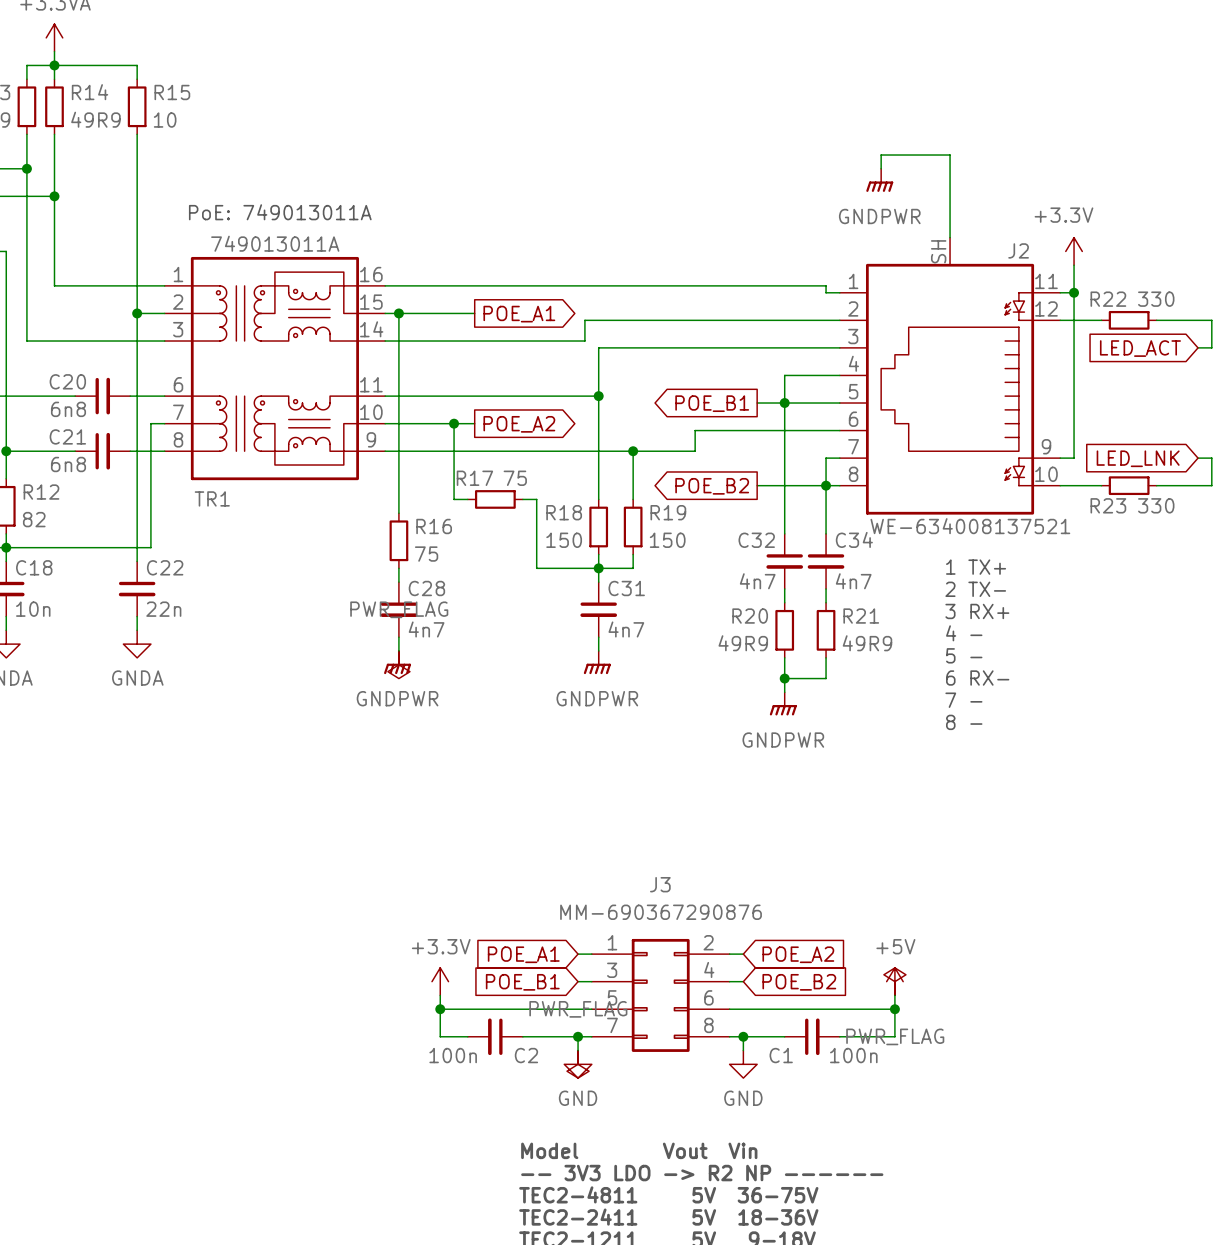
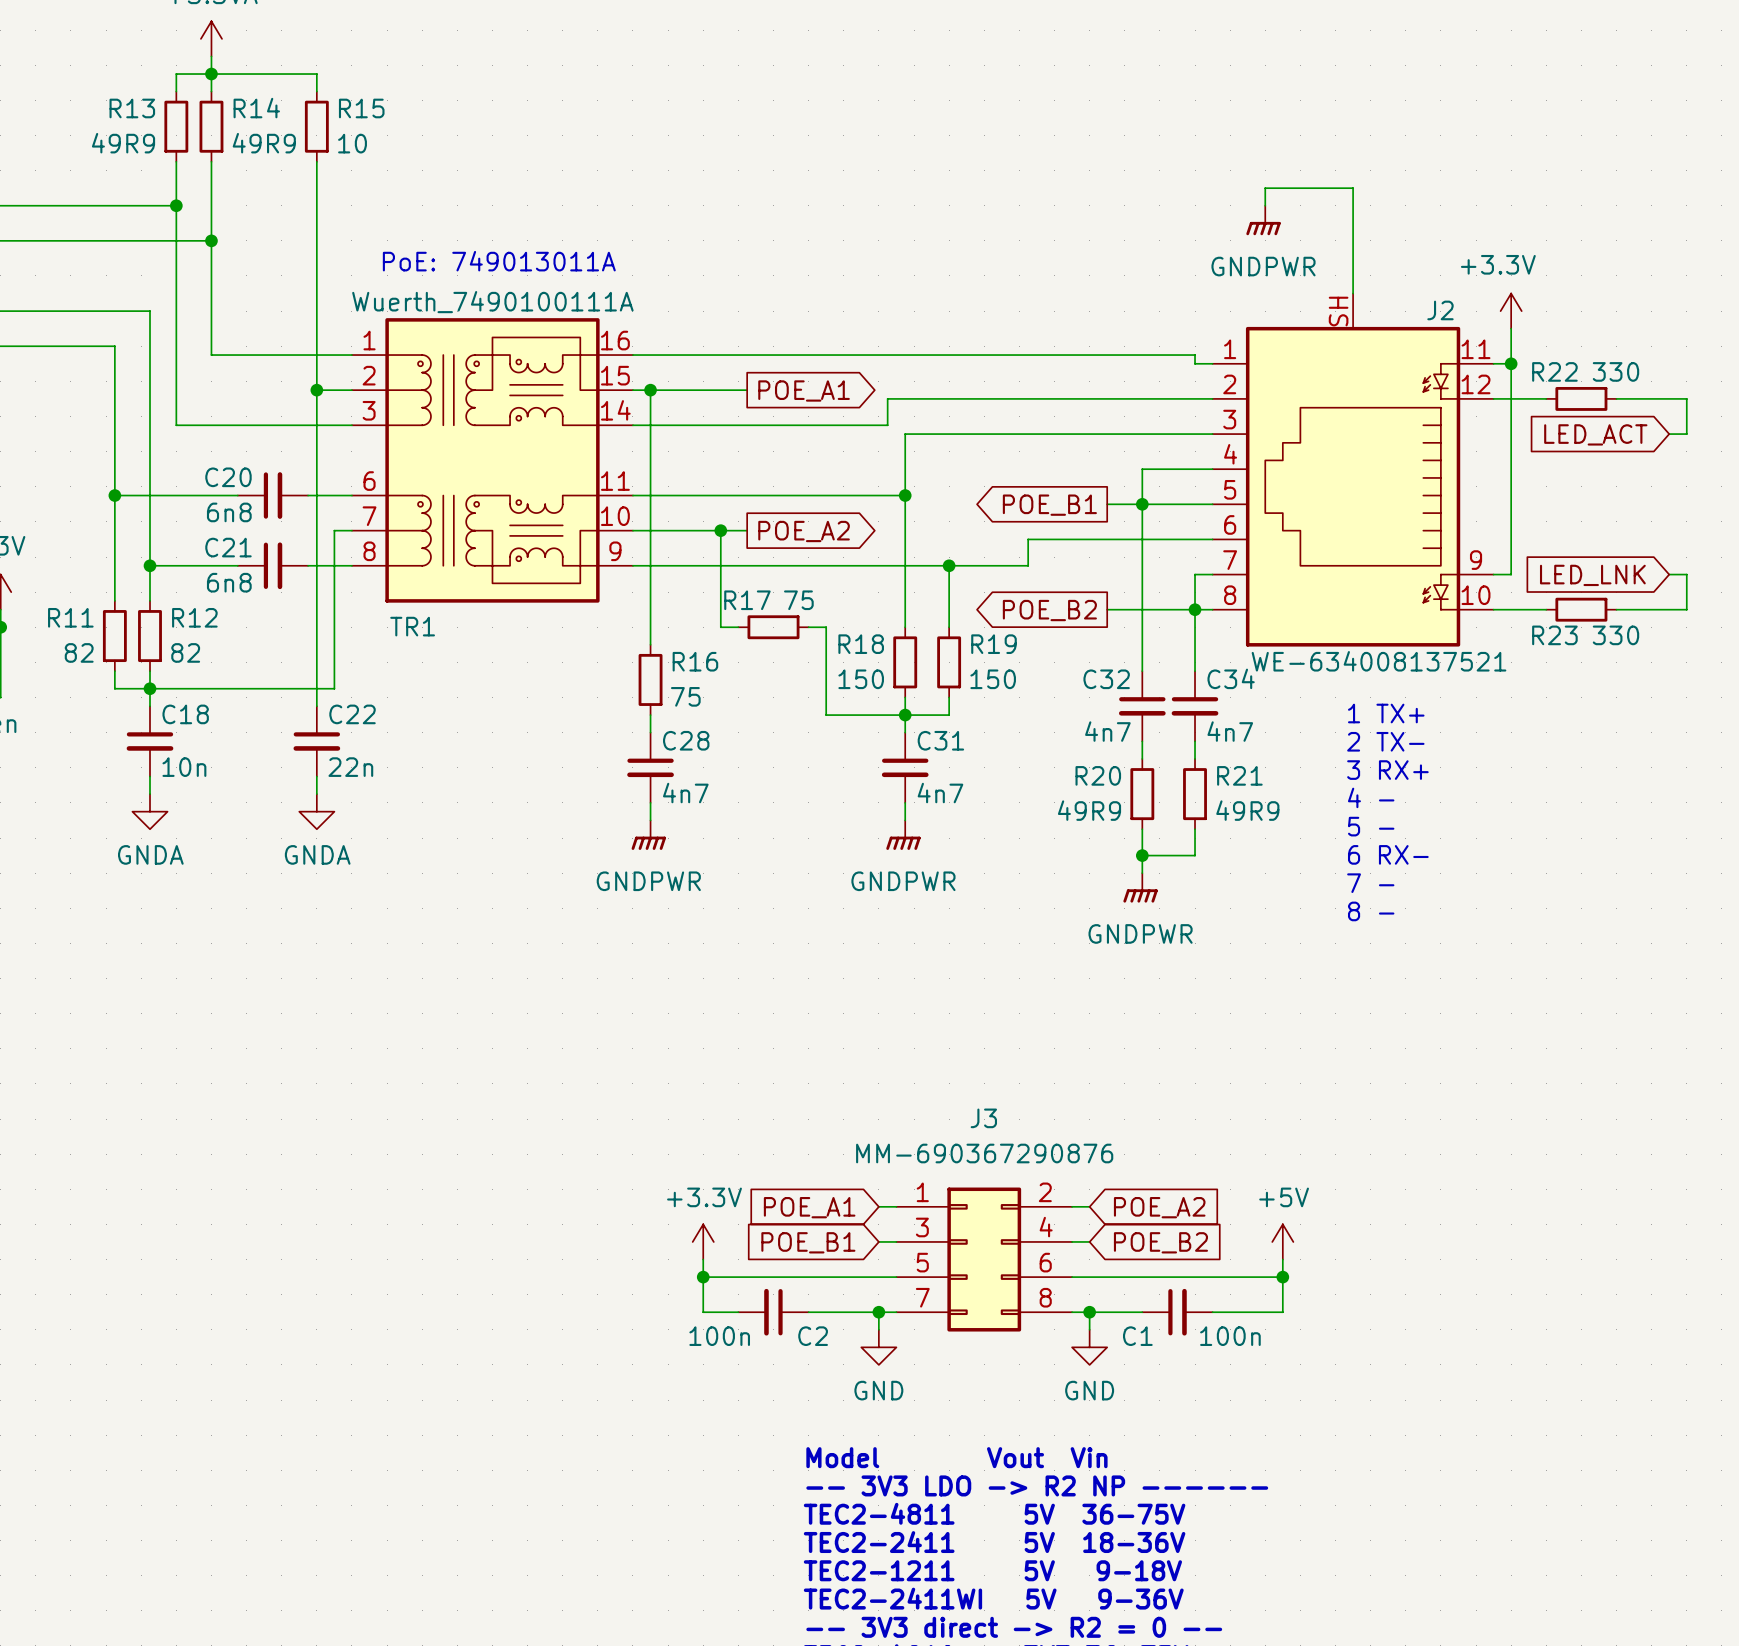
TR1 value: 749013011A (275, 243) -> Wuerth_7490100111A (492, 302)
power symbol: PWR_FLAG (398, 664) -> none
power symbol: PWR_FLAG (894, 981) -> none
power symbol: PWR_FLAG (578, 1064) -> none

